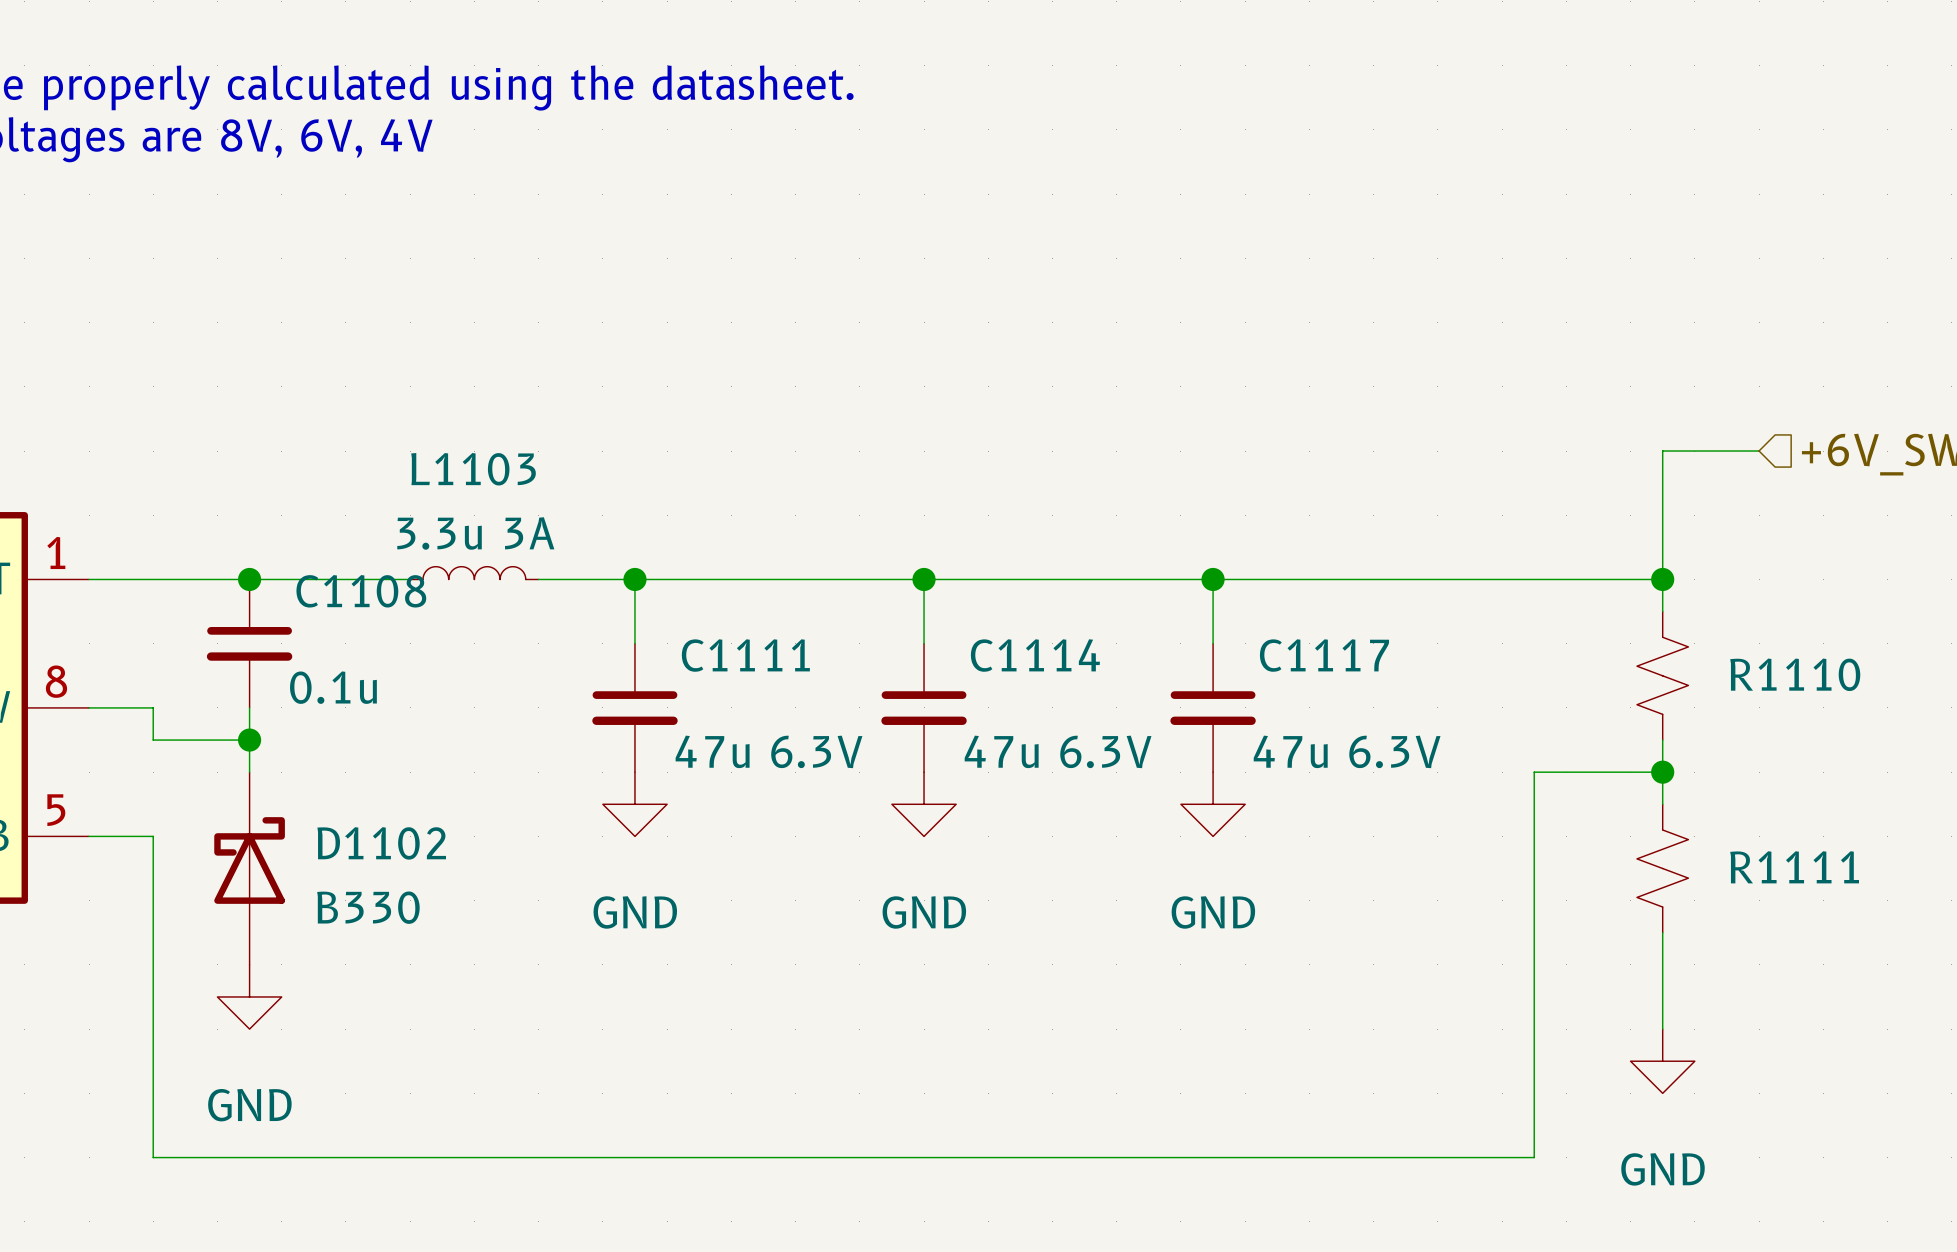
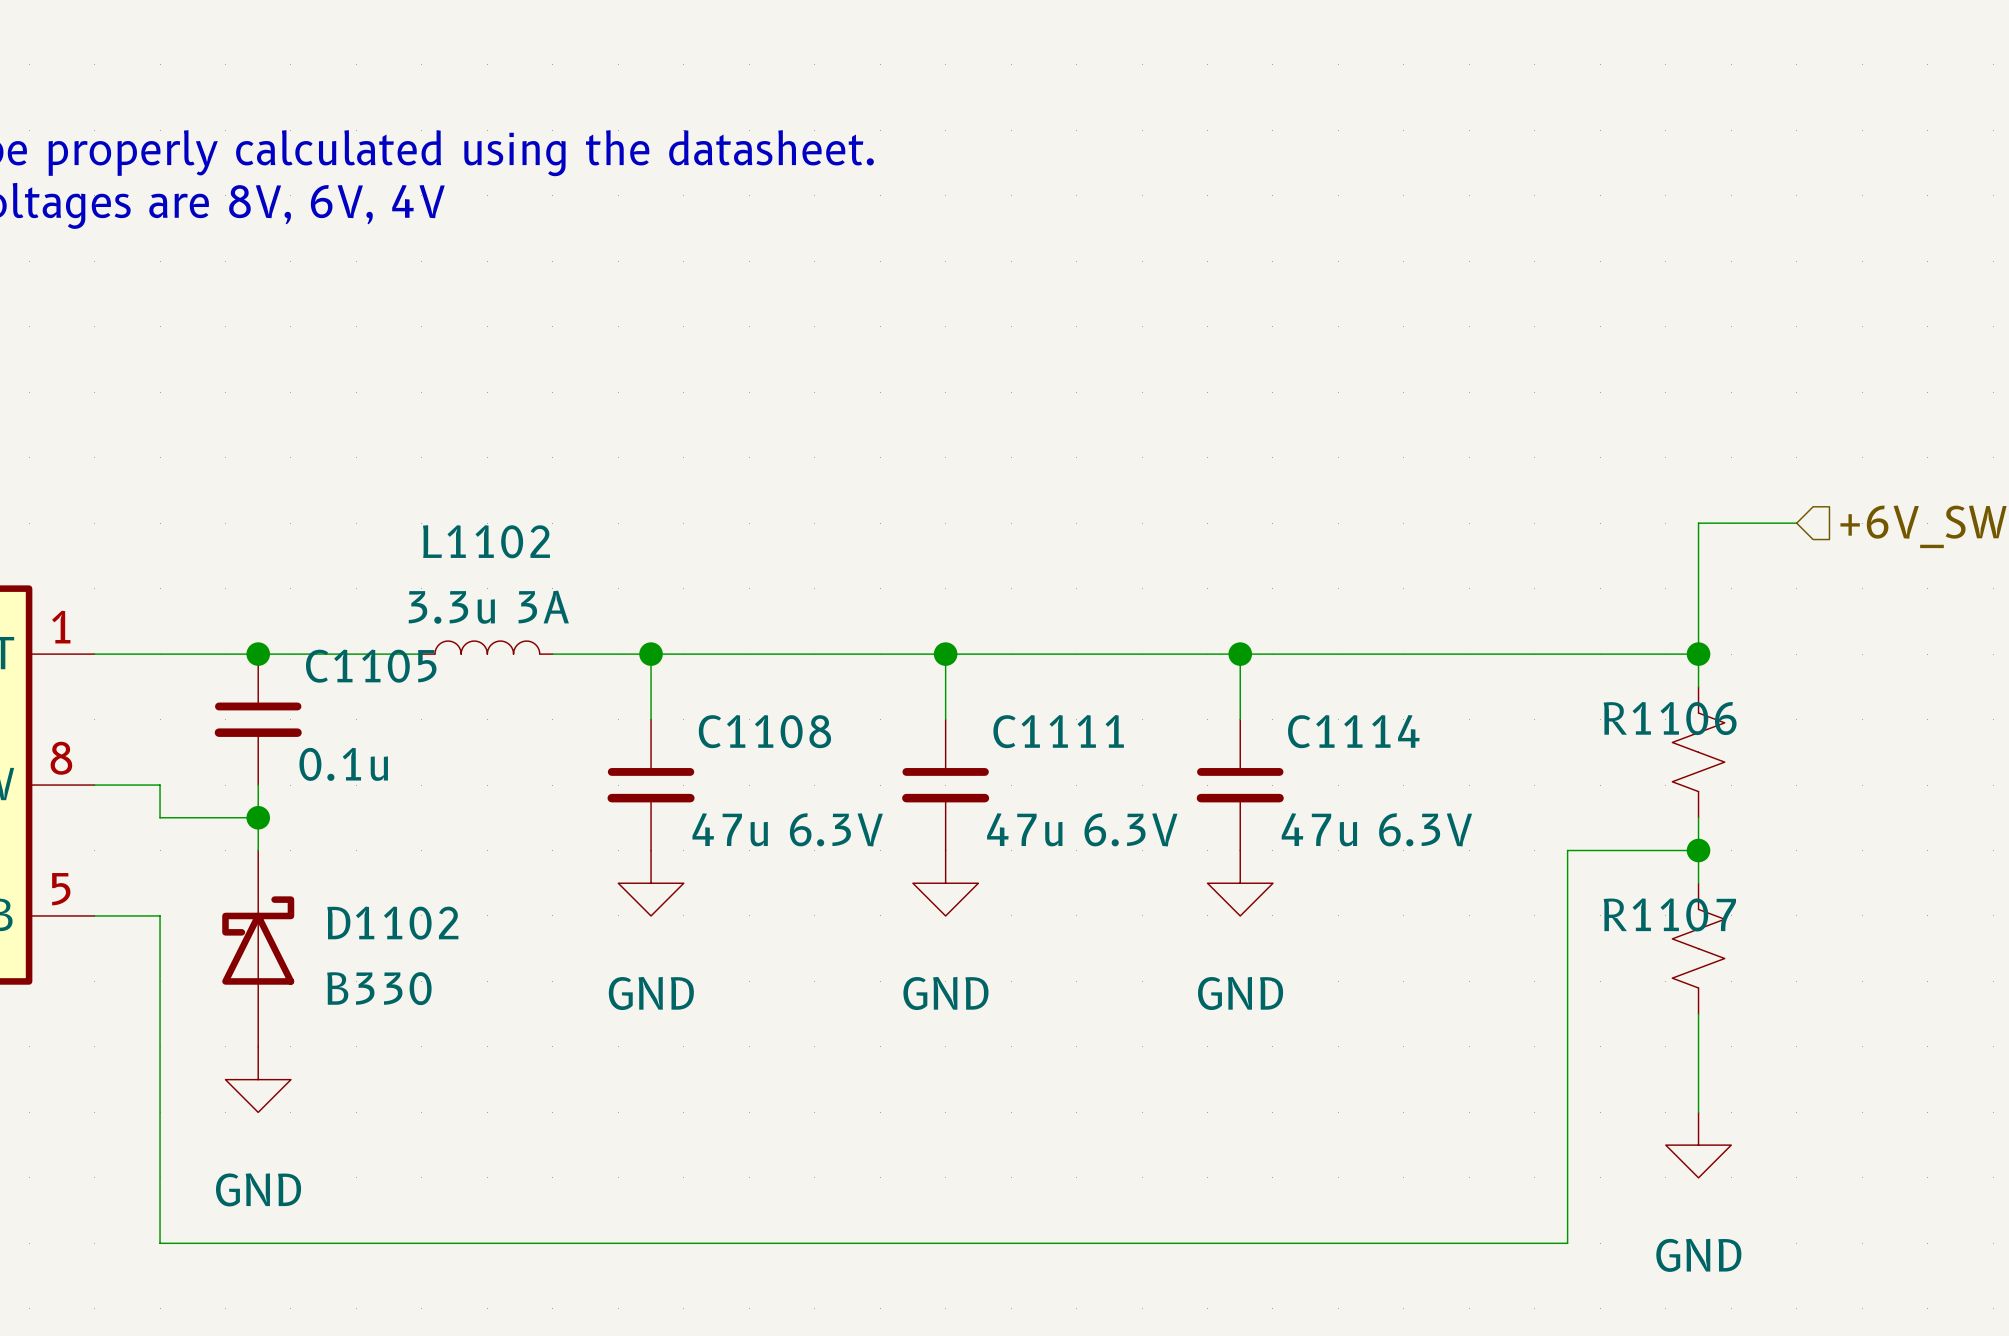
L1103 name: L1103 (473, 469) -> L1102 (486, 541)
C1108 name: C1108 (361, 591) -> C1105 (371, 666)
C1111 name: C1111 (745, 655) -> C1108 (764, 731)
C1114 name: C1114 (1035, 655) -> C1111 (1058, 731)
C1117 name: C1117 (1324, 655) -> C1114 (1353, 731)
R1110 name: R1110 (1795, 674) -> R1106 (1670, 718)
R1111 name: R1111 (1794, 867) -> R1107 (1669, 914)

